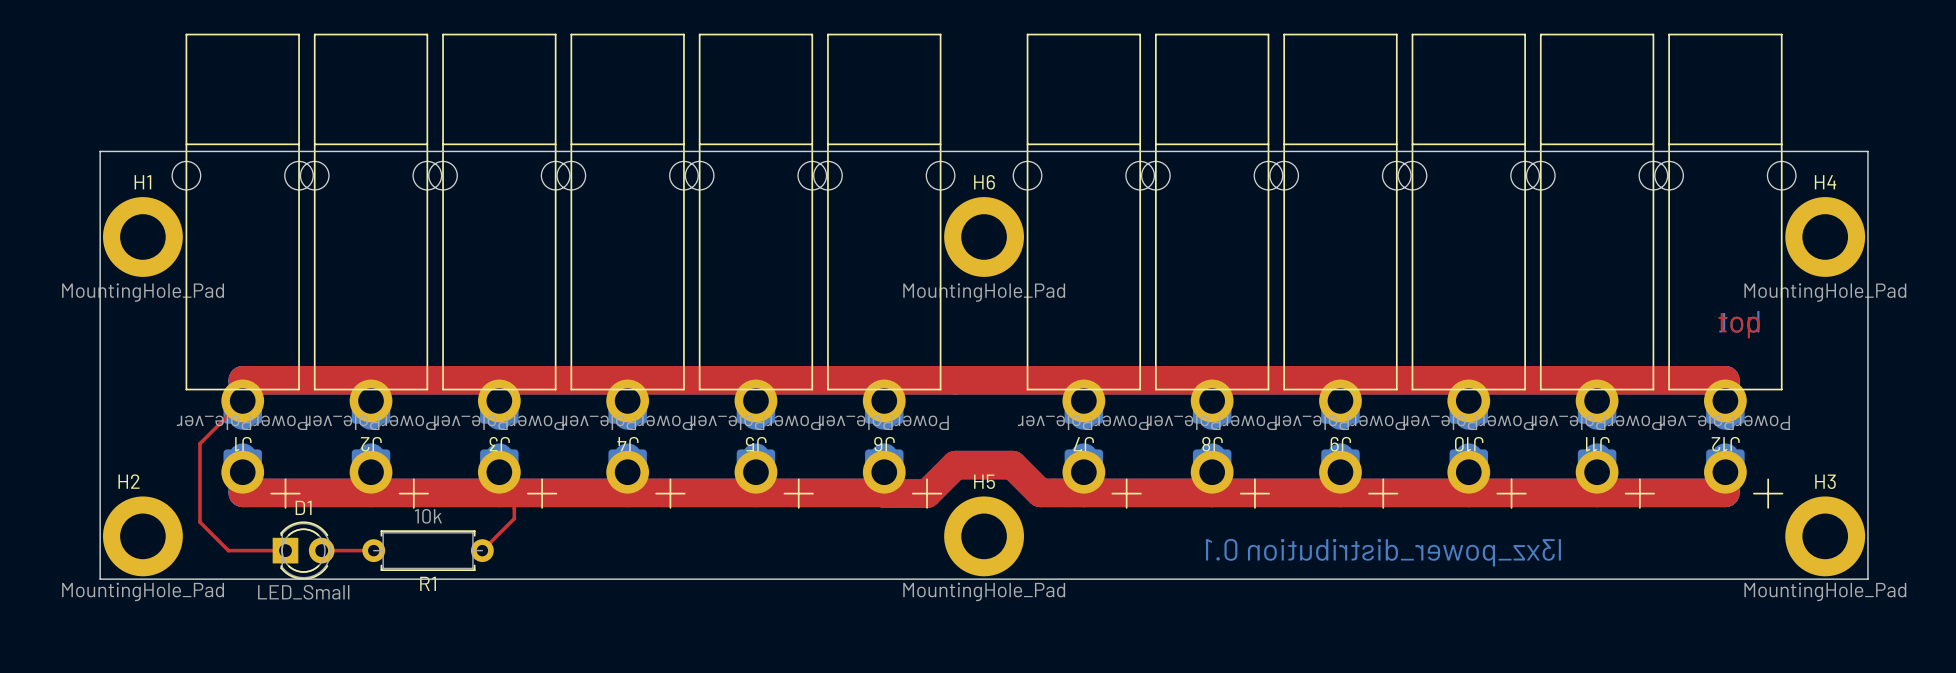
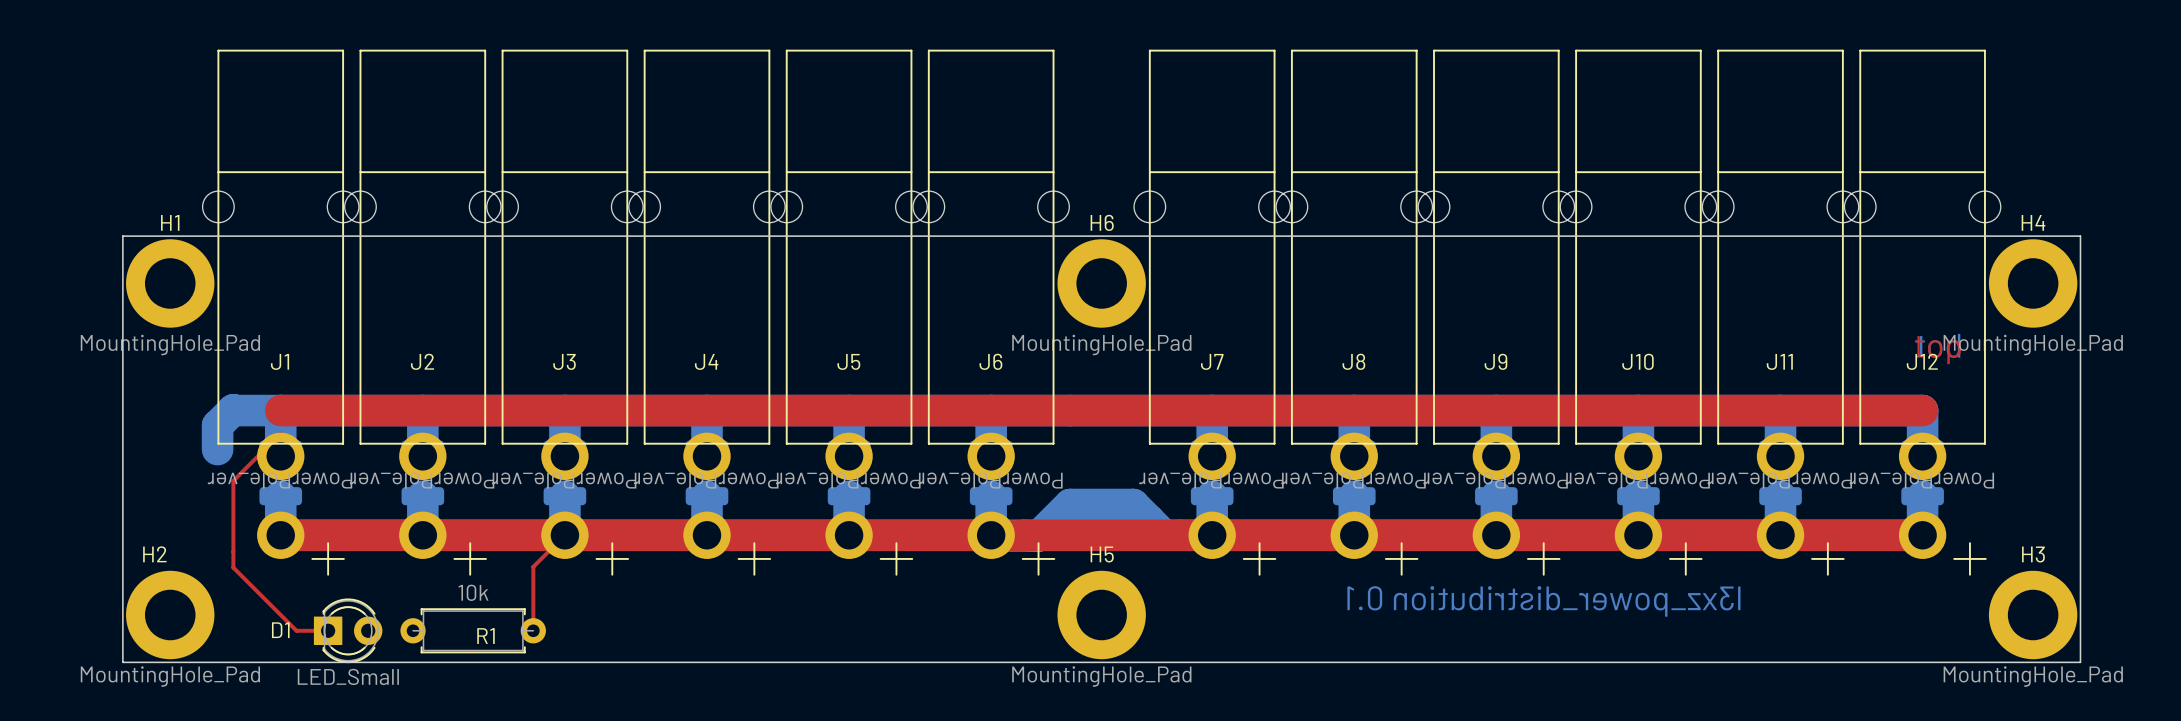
board edge: (100, 222) (100, 151) (1867, 151) (1867, 222) -> (122, 236) (2080, 236)
H1 position: (142, 236) -> (170, 283)
H6 position: (984, 236) -> (1101, 283)
H4 position: (1825, 236) -> (2033, 283)
J1 position: (242, 271) -> (280, 312)
J2 position: (371, 271) -> (422, 312)
J3 position: (499, 271) -> (564, 312)
J4 position: (627, 271) -> (707, 312)
J5 position: (755, 271) -> (849, 312)
J6 position: (884, 271) -> (991, 312)
J7 position: (1083, 271) -> (1212, 312)
J8 position: (1212, 271) -> (1354, 312)
J9 position: (1340, 271) -> (1496, 312)
J10 position: (1468, 271) -> (1638, 312)
J11 position: (1597, 271) -> (1780, 312)
J12 position: (1725, 271) -> (1922, 312)
bottom track: none -> (280, 410) (233, 409) (217, 425) (217, 449)
J1 name rotation: 0° (243, 444) -> 180° (280, 361)
J1 name position: J1 (243, 444) -> J1 (280, 361)
J2 name rotation: 0° (371, 444) -> 180° (422, 361)
J2 name position: J2 (371, 444) -> J2 (422, 361)
J3 name rotation: 0° (499, 444) -> 180° (564, 361)
J3 name position: J3 (499, 444) -> J3 (564, 361)
J4 name rotation: 0° (627, 444) -> 180° (706, 361)
J4 name position: J4 (627, 444) -> J4 (706, 361)
J5 name rotation: 0° (756, 444) -> 180° (848, 361)
J5 name position: J5 (756, 444) -> J5 (848, 361)
J6 name rotation: 0° (884, 444) -> 180° (990, 361)
J6 name position: J6 (884, 444) -> J6 (990, 361)
J7 name rotation: 0° (1083, 444) -> 180° (1212, 361)
J7 name position: J7 (1083, 444) -> J7 (1212, 361)
J8 name rotation: 0° (1212, 444) -> 180° (1353, 361)
J8 name position: J8 (1212, 444) -> J8 (1353, 361)
J9 name rotation: 0° (1340, 444) -> 180° (1495, 361)
J9 name position: J9 (1340, 444) -> J9 (1495, 361)
J10 name rotation: 0° (1469, 444) -> 180° (1637, 361)
J10 name position: J10 (1469, 444) -> J10 (1637, 361)
J11 name rotation: 0° (1597, 444) -> 180° (1779, 361)
J11 name position: J11 (1597, 444) -> J11 (1779, 361)
J12 name rotation: 0° (1725, 444) -> 180° (1922, 361)
J12 name position: J12 (1725, 444) -> J12 (1922, 361)
top track: none -> (564, 535) (533, 566) (533, 630)
top track: (514, 492) (514, 518) (482, 550) -> none
top track: (1040, 492) (1012, 465) (955, 465) (927, 493) (912, 493) -> (1164, 535) (1022, 536)
D1 name position: D1 (303, 507) -> D1 (280, 630)
H2 position: (142, 536) -> (170, 615)
H5 position: (984, 536) -> (1101, 615)
H3 position: (1825, 536) -> (2033, 615)
top track: (228, 550) (285, 550) -> (264, 599) (296, 630) (328, 630)
D1 position: (303, 550) -> (348, 630)
top track: (321, 550) (373, 550) -> none
R1 position: (428, 550) -> (473, 630)
board edge: (100, 579) (1867, 579) -> (122, 630) (122, 662) (2080, 662) (2080, 630)

